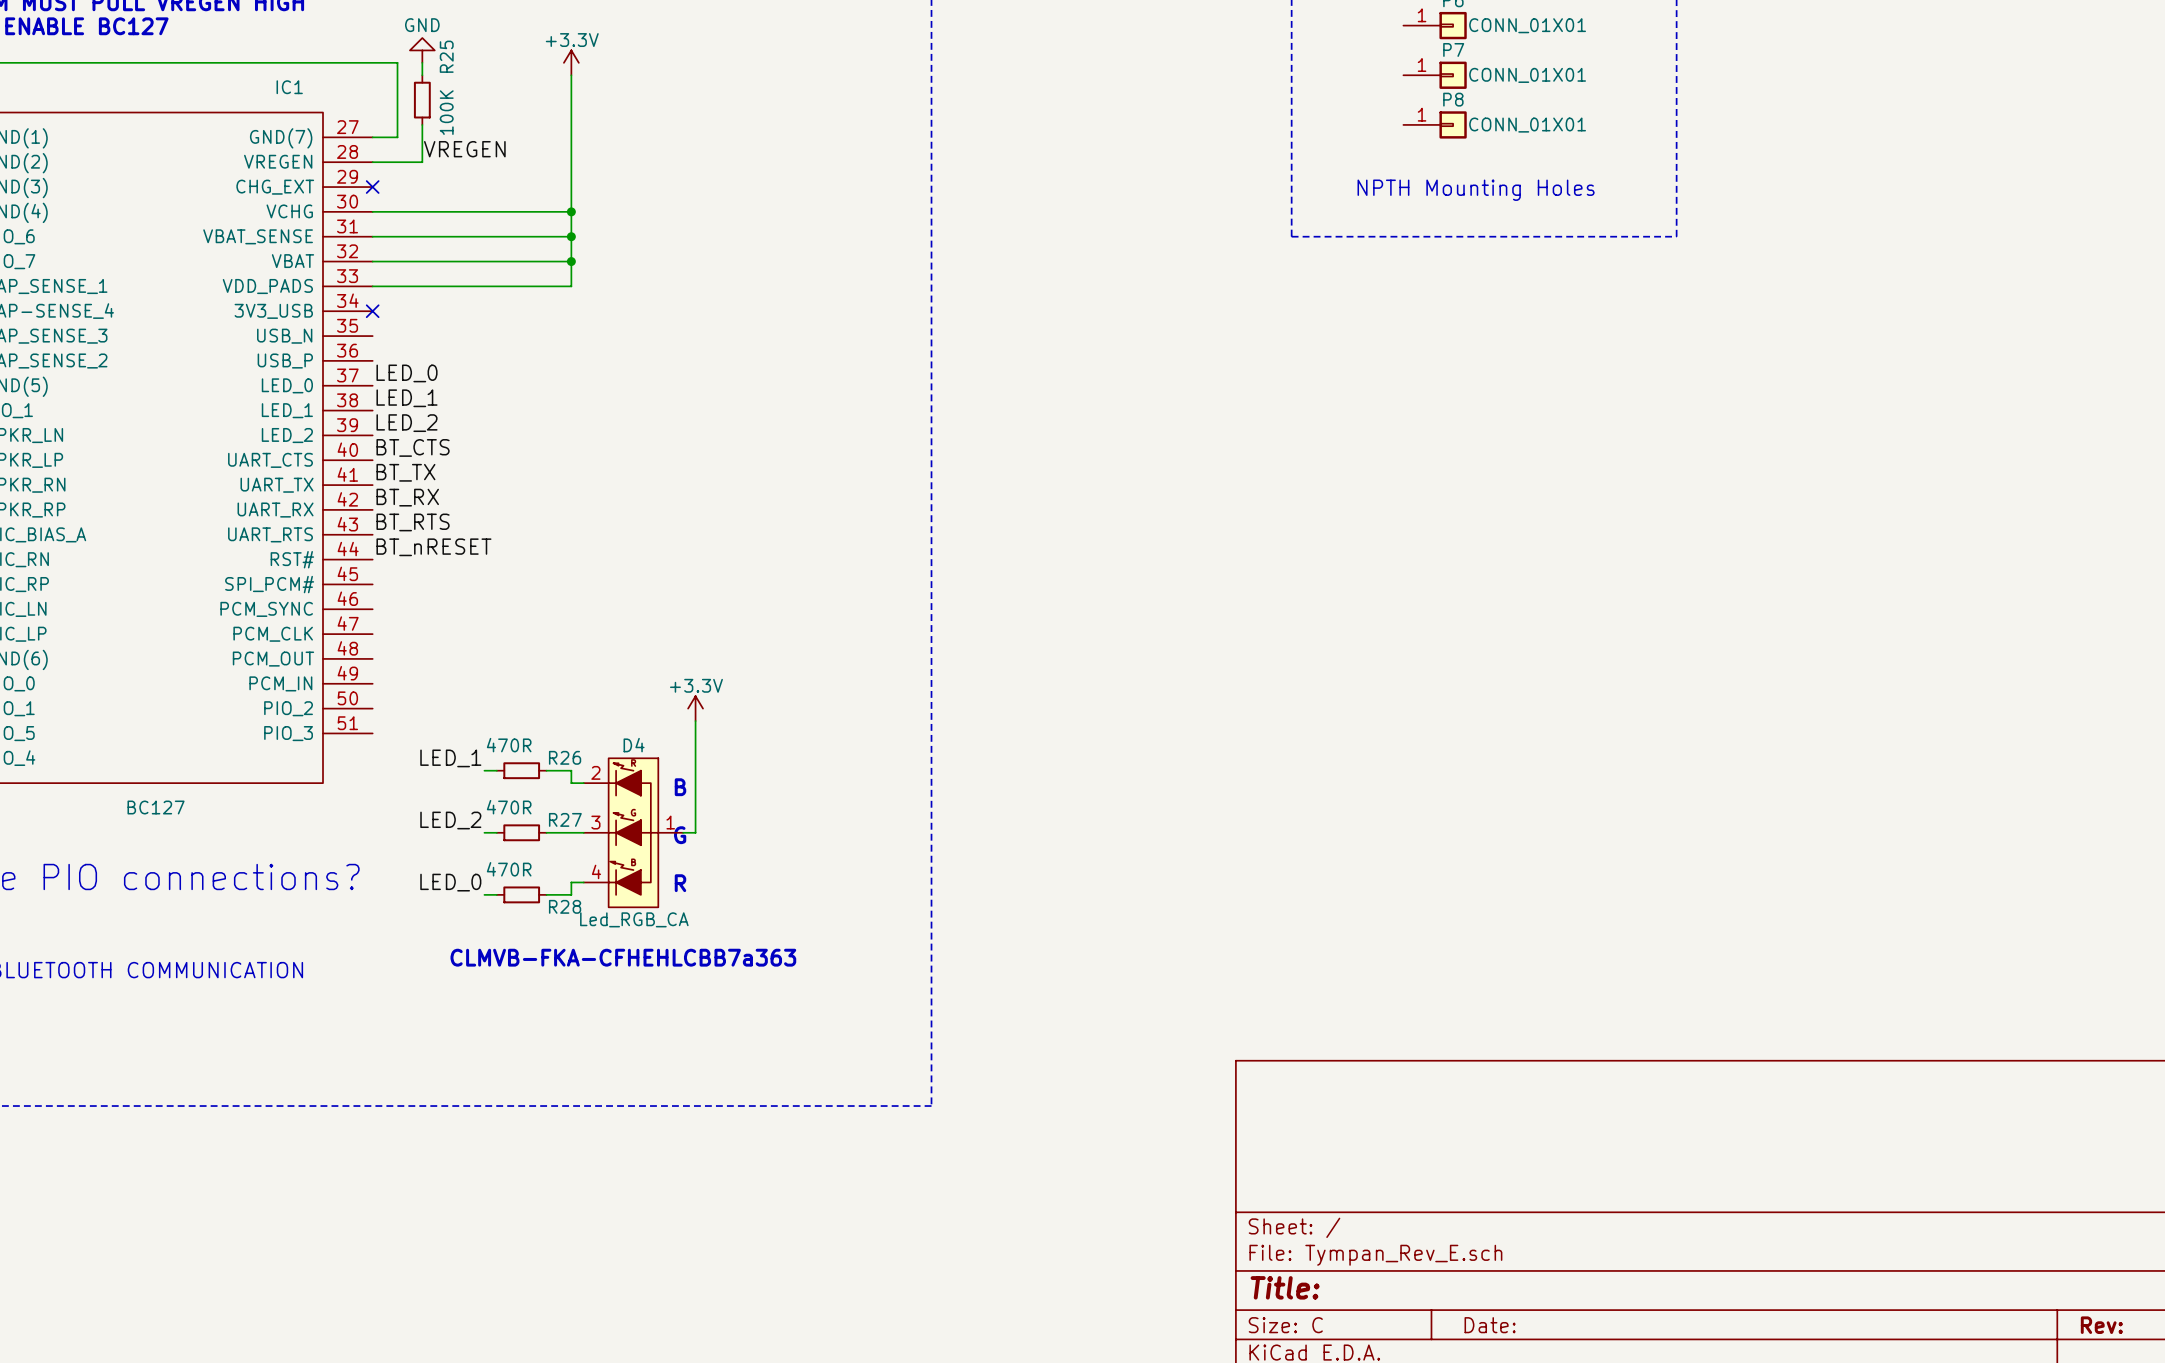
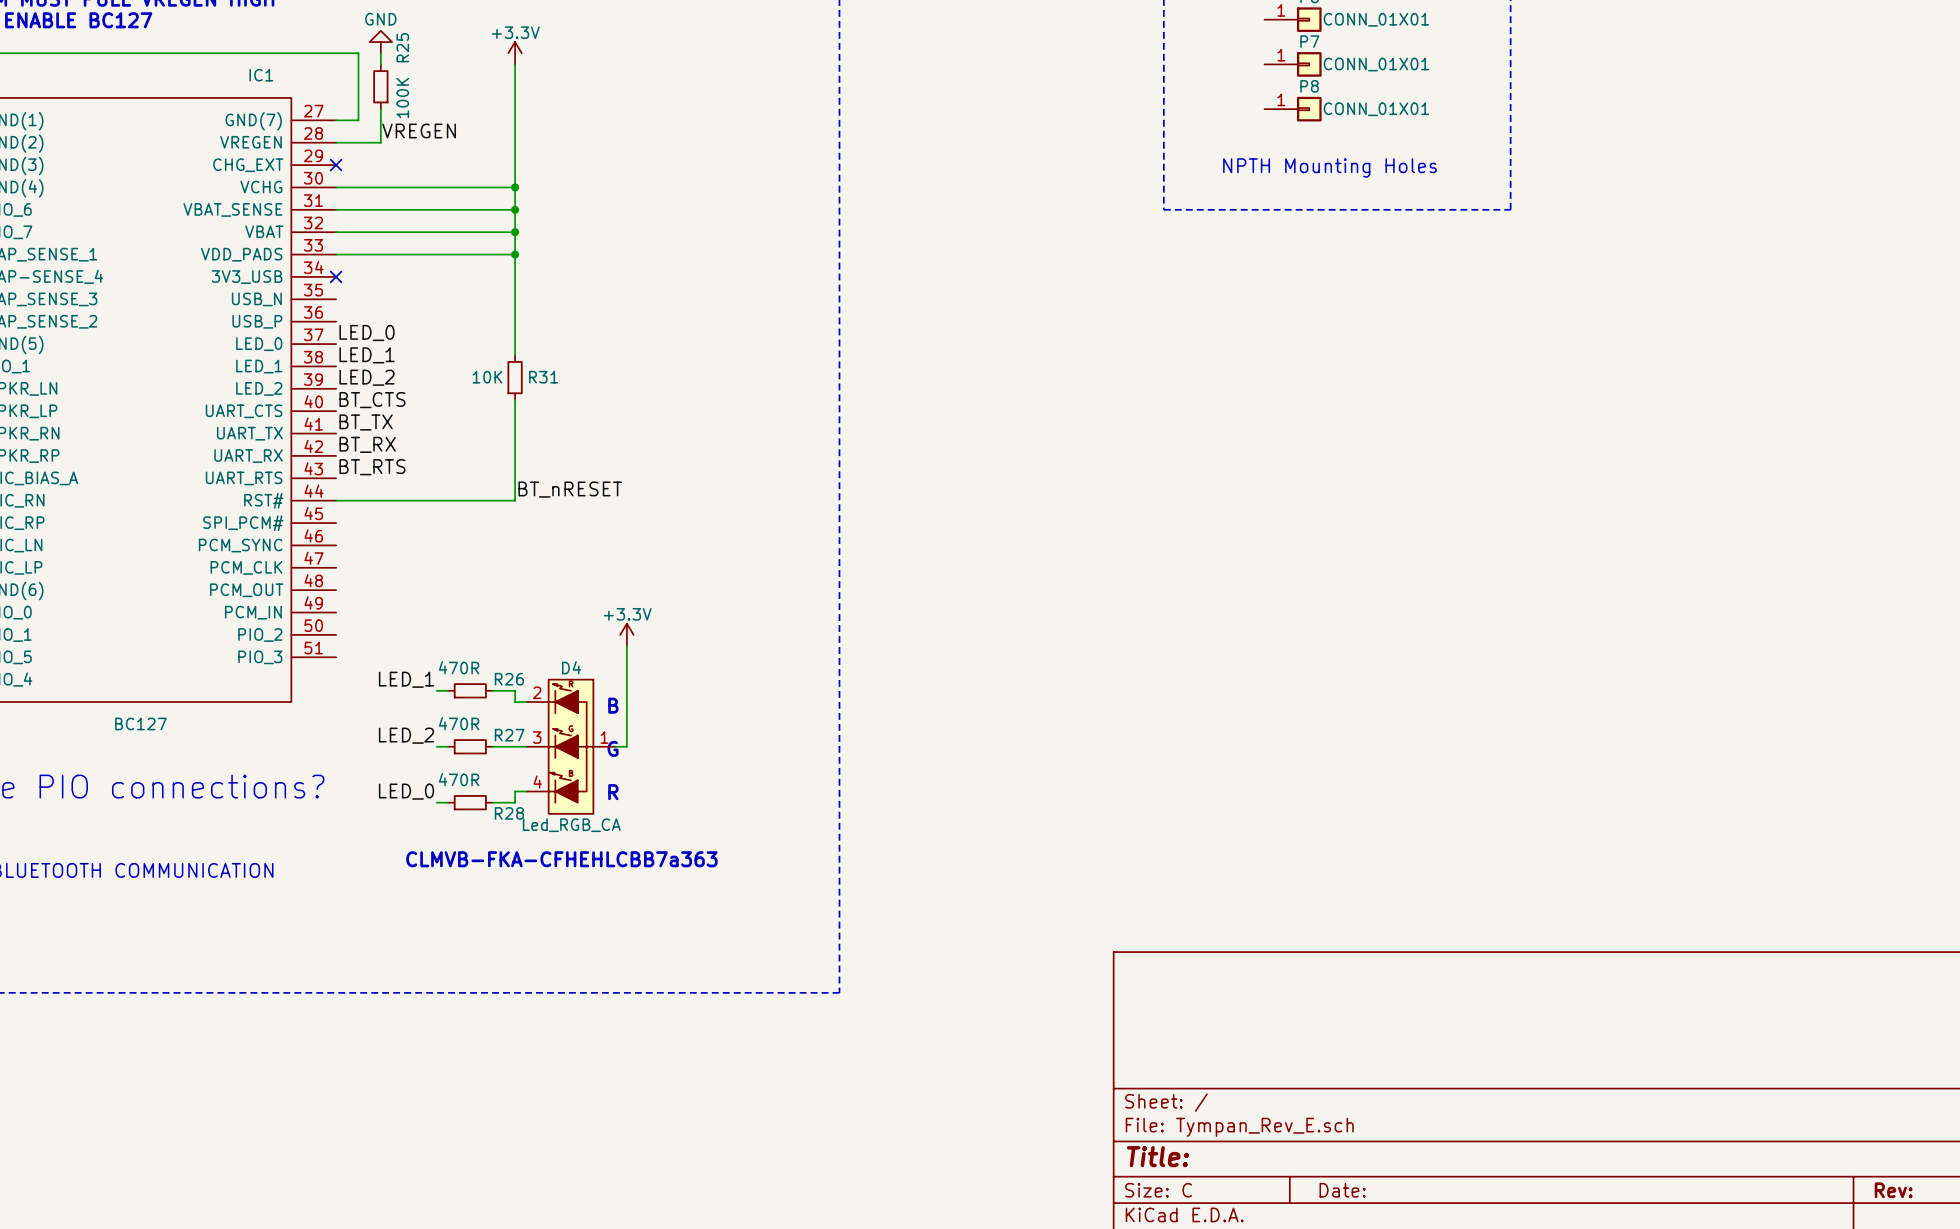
wire: none -> (515, 254) (515, 355)
junction: none -> (515, 254)
R31: none -> 10K (515, 377)
wire: none -> (515, 399) (515, 500) (336, 500)
label position: BT_nRESET (433, 547) -> BT_nRESET (570, 489)

